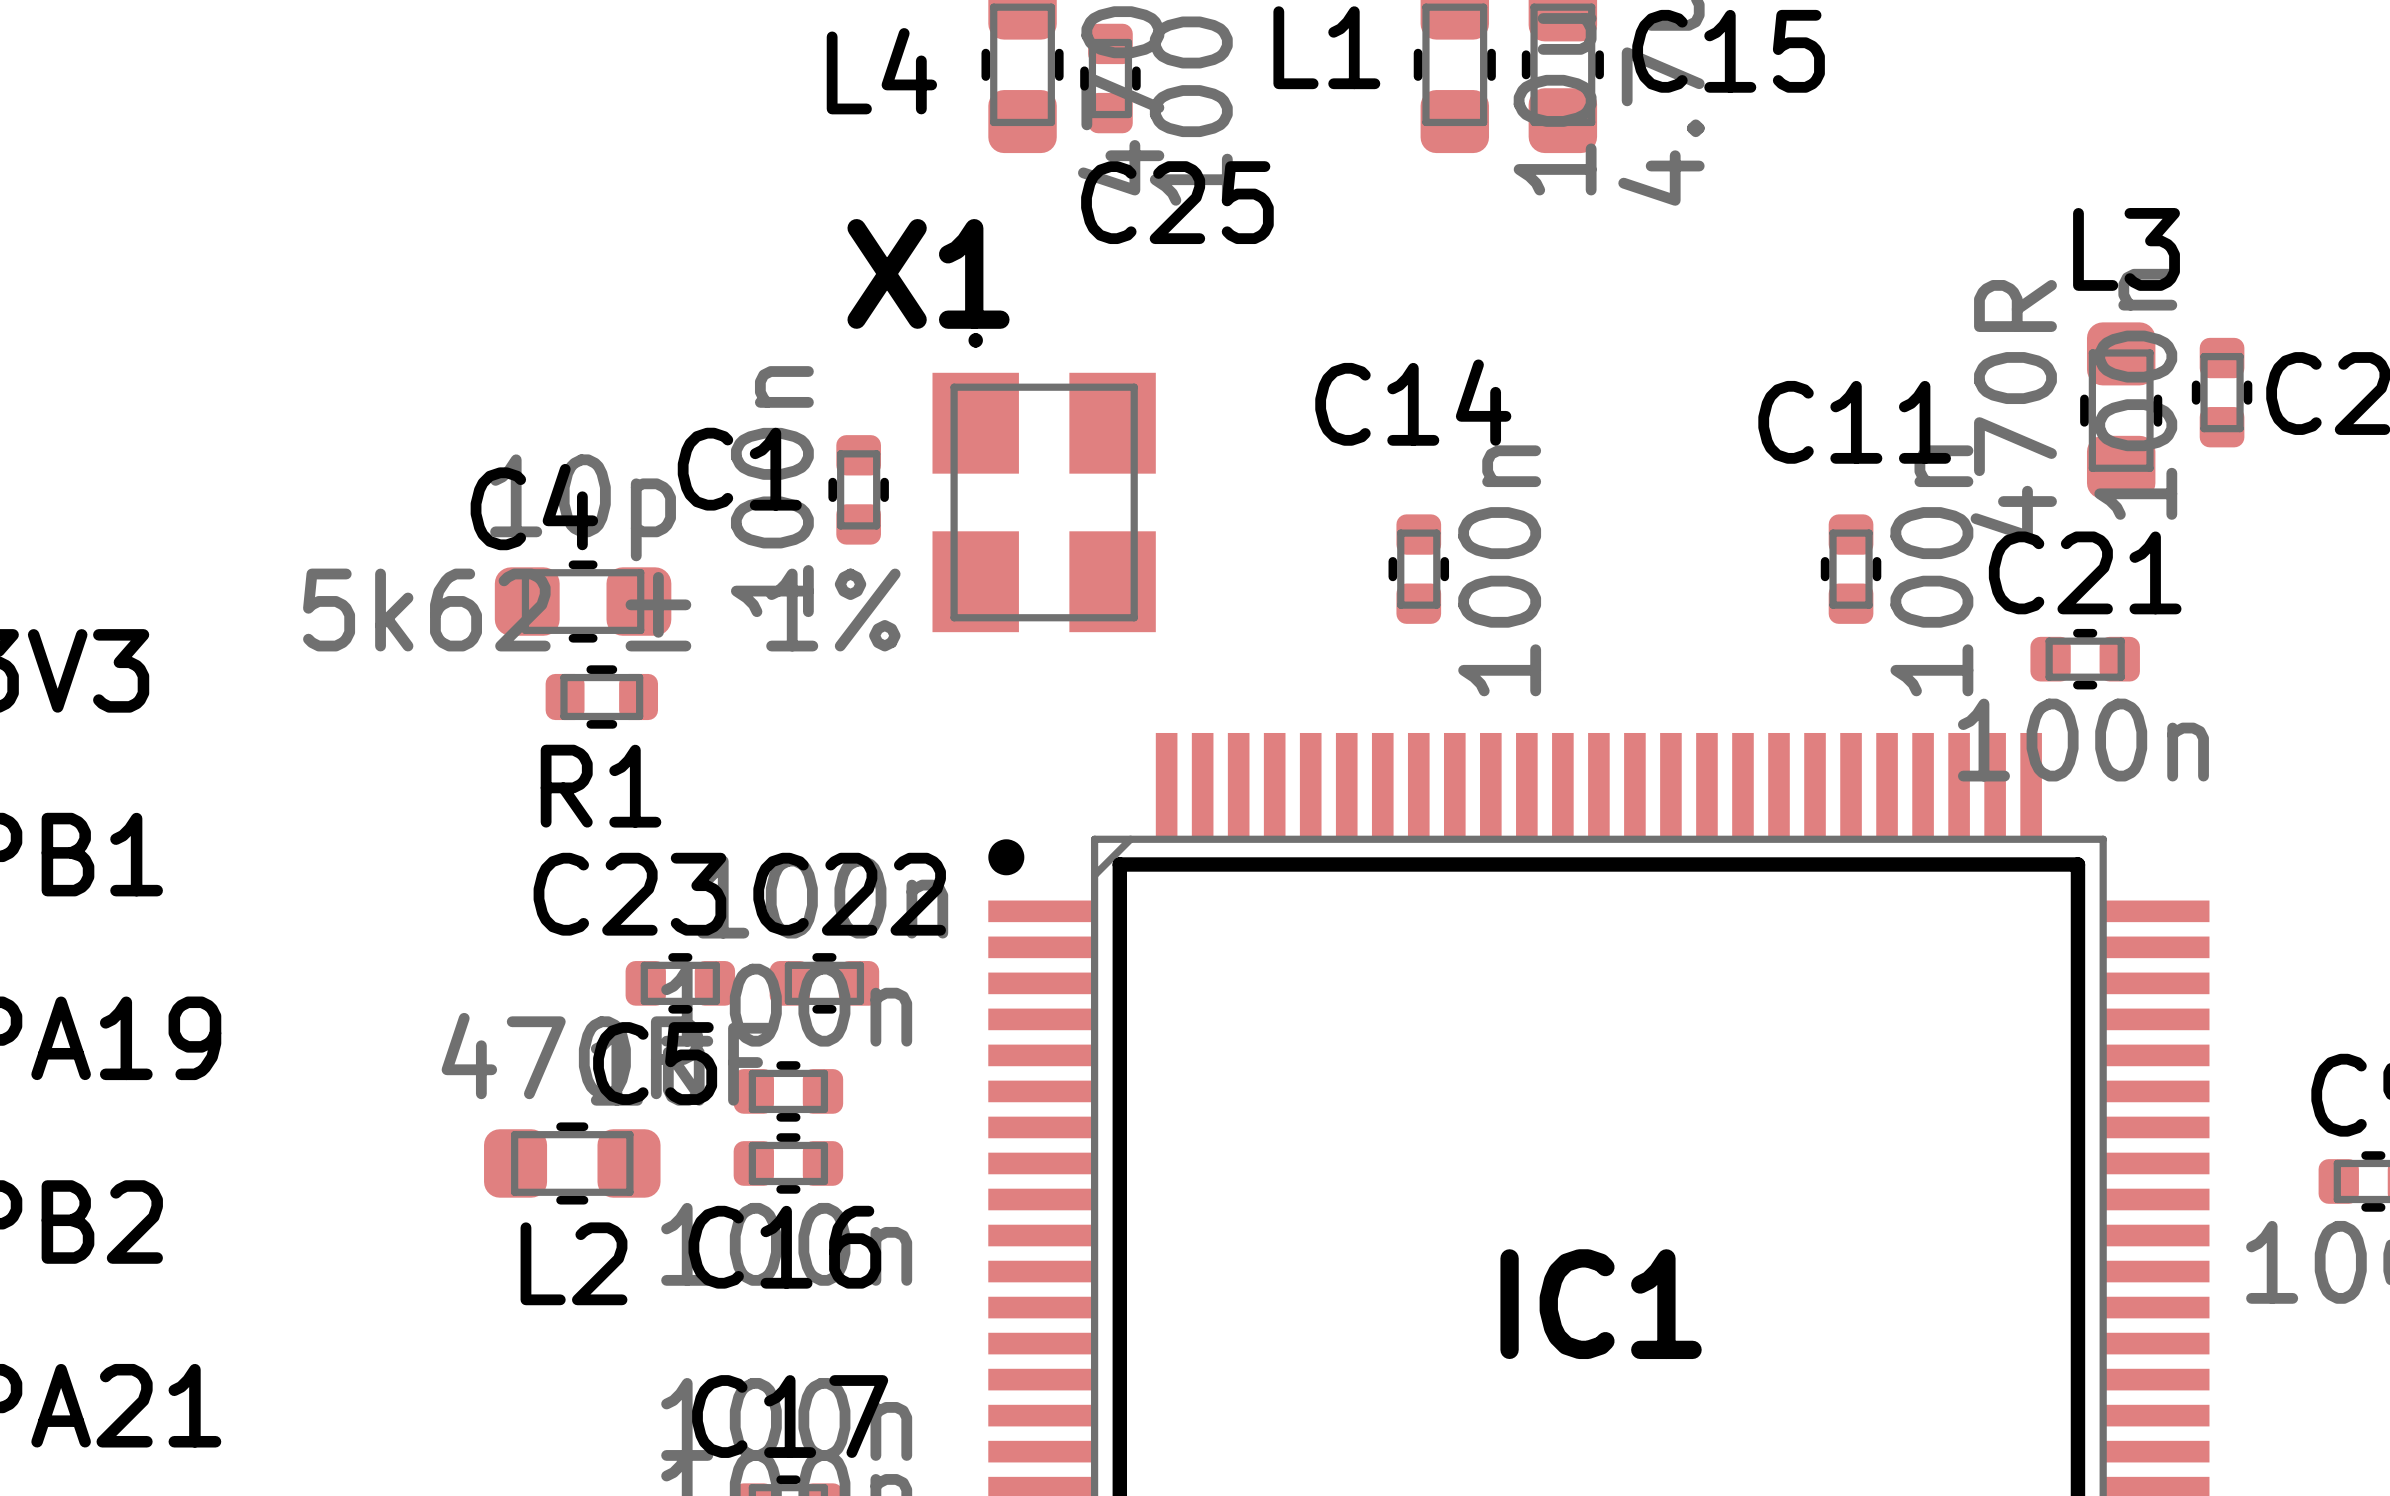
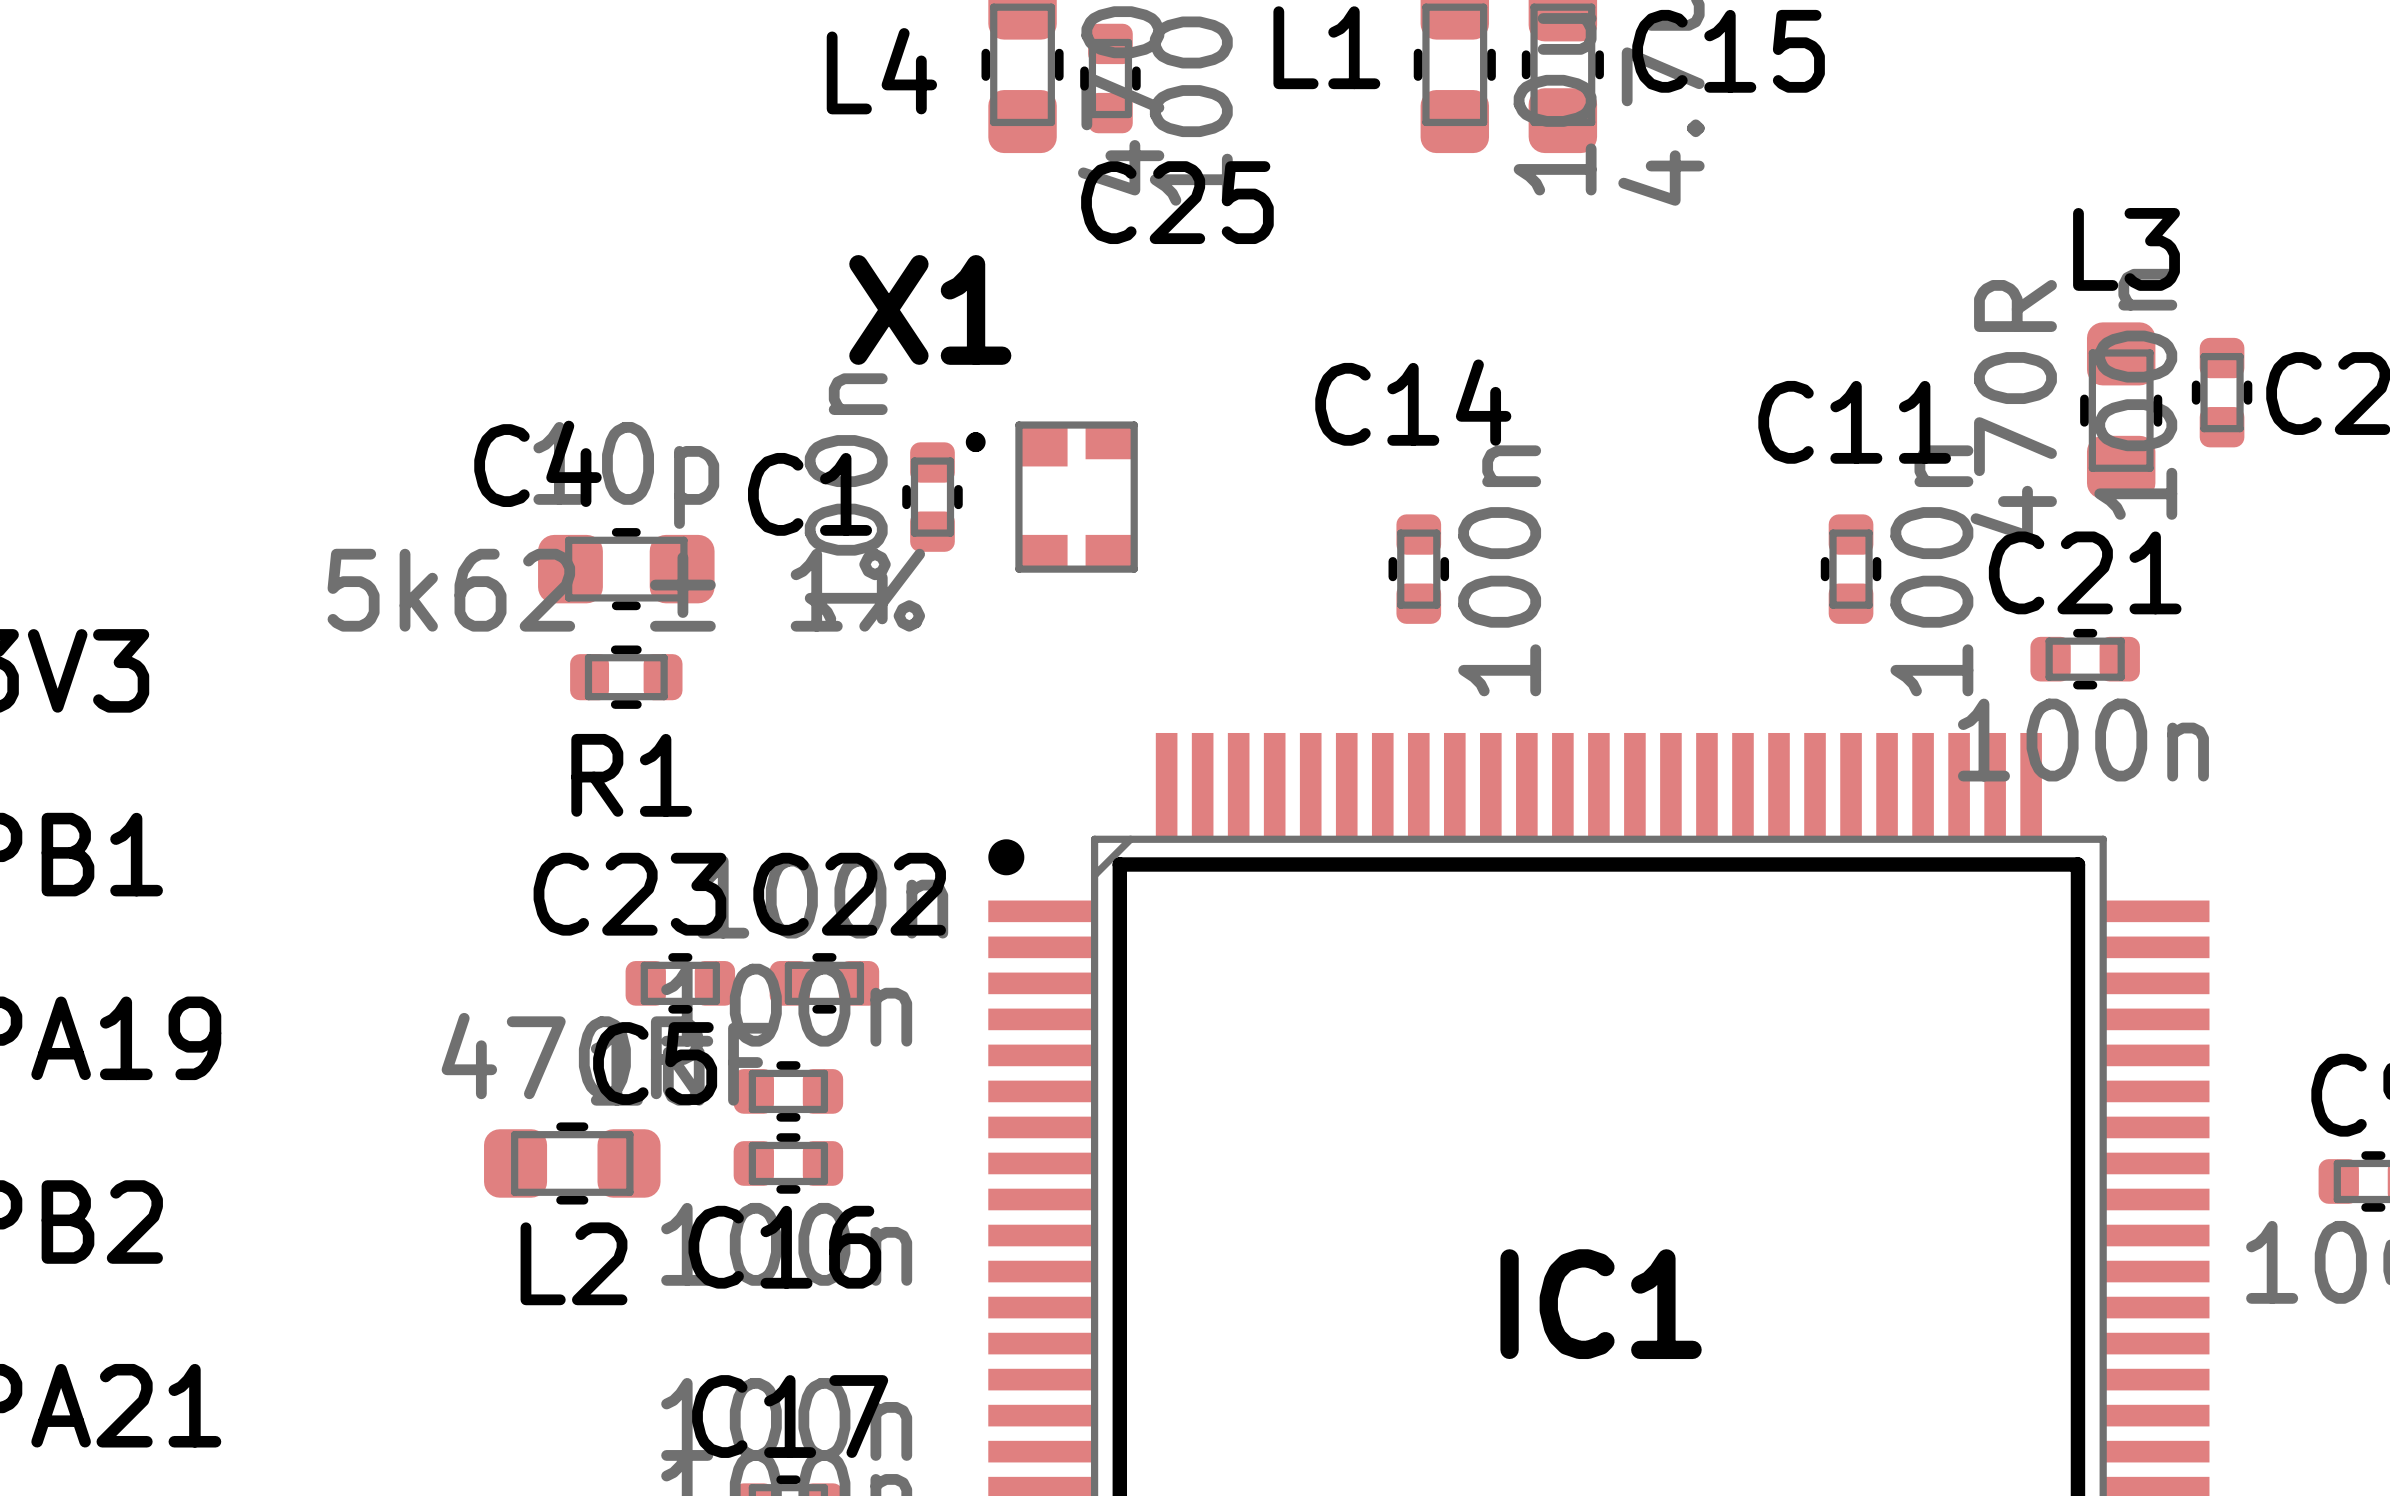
X1 footprint: [932, 333, 1156, 633] -> [965, 421, 1138, 573]
C1 name position: C1 (739, 469) -> C1 (810, 494)
C1 position: (858, 489) -> (932, 497)
C4 name position: C4 (534, 507) -> C4 (537, 463)
C4 position: (583, 601) -> (626, 569)
R1 position: (601, 696) -> (626, 677)
R1 name position: R1 (601, 786) -> R1 (631, 775)

